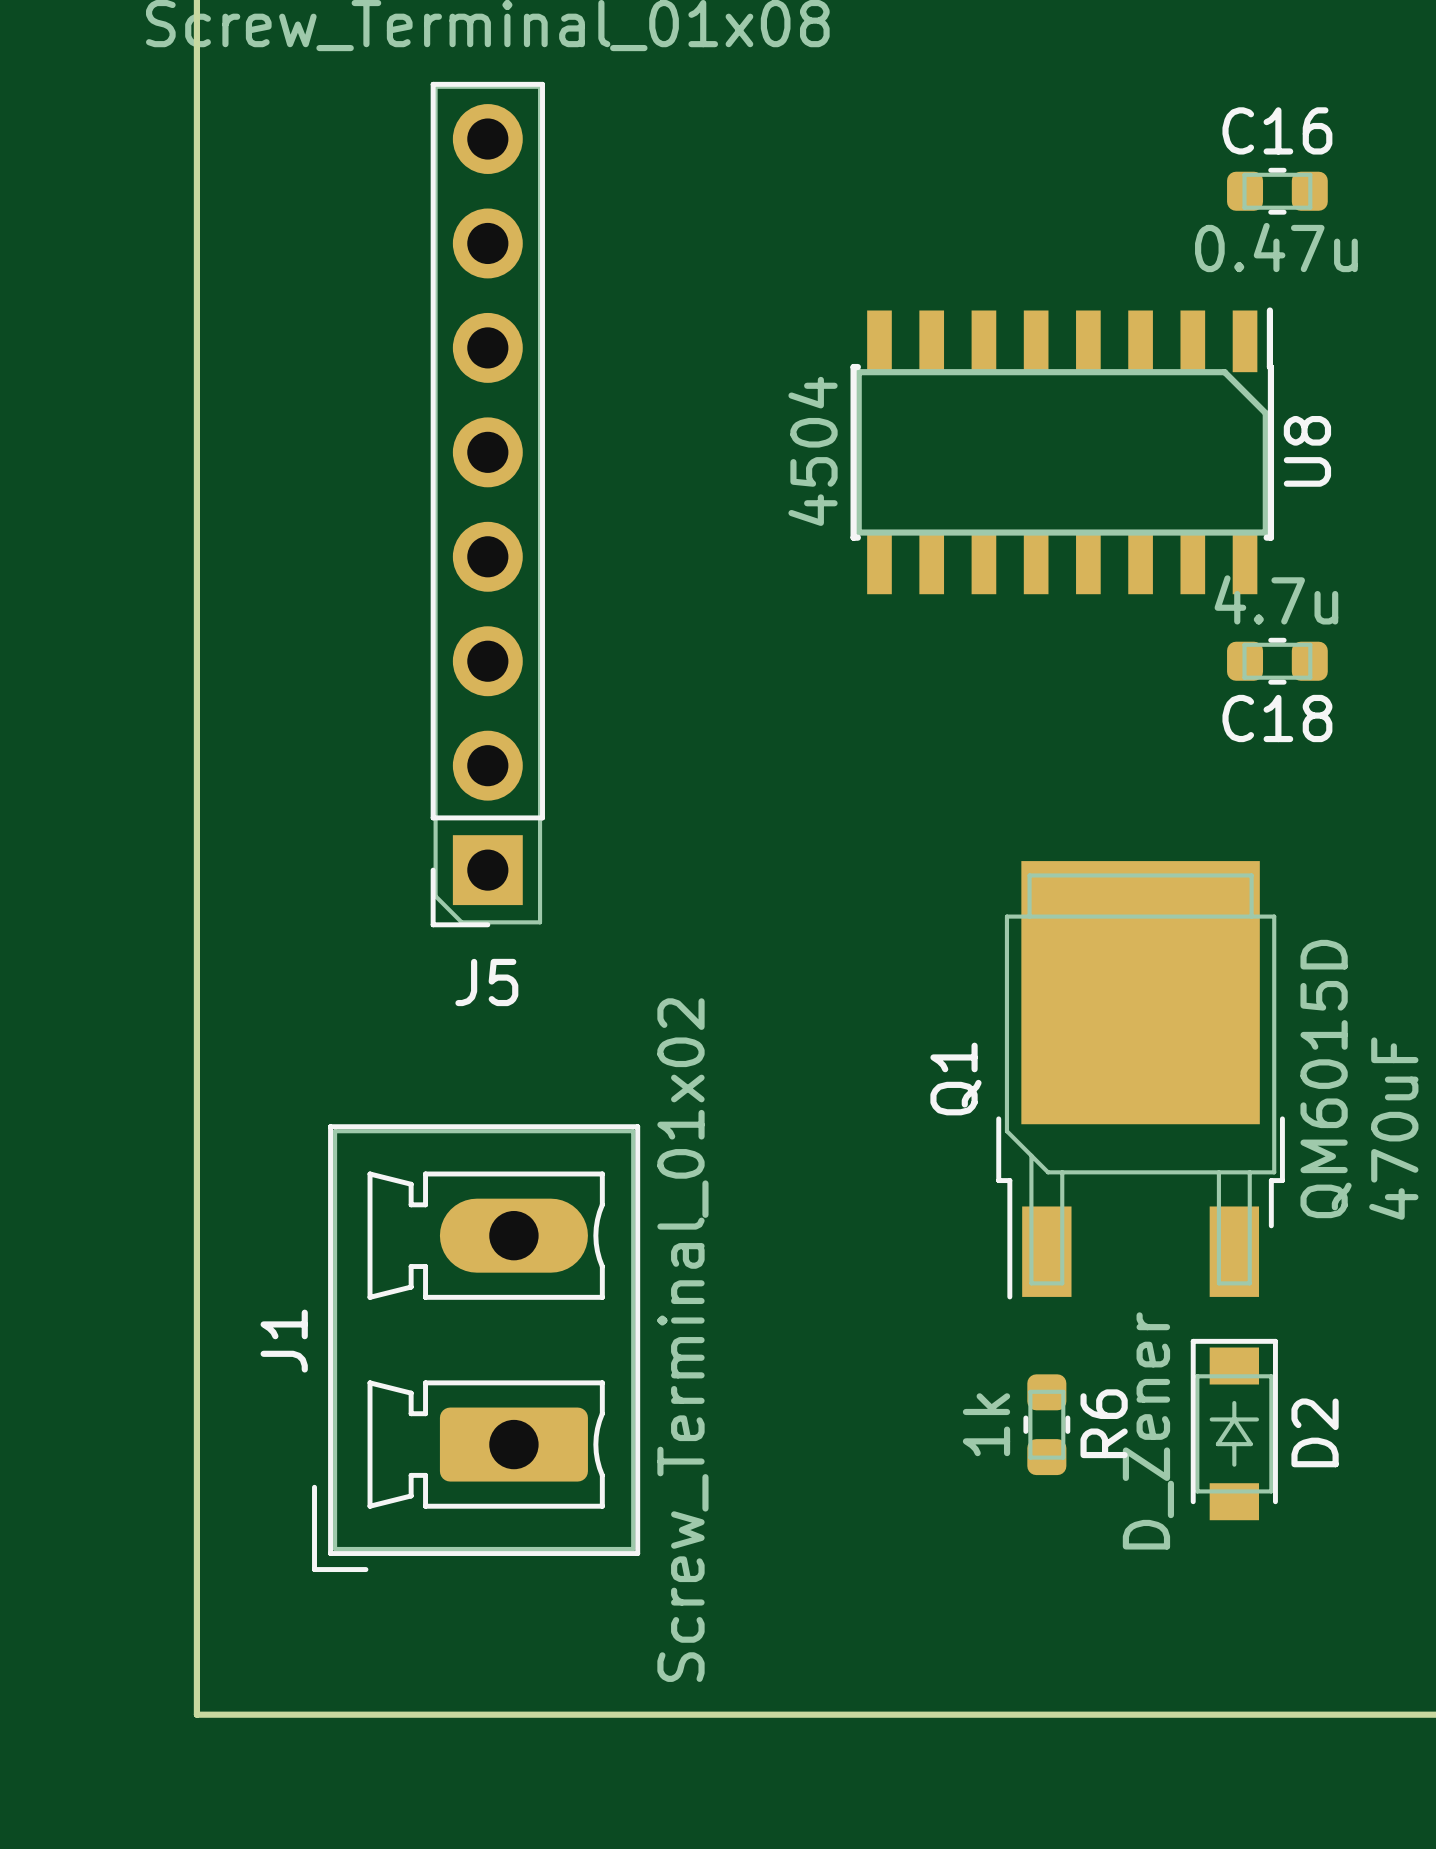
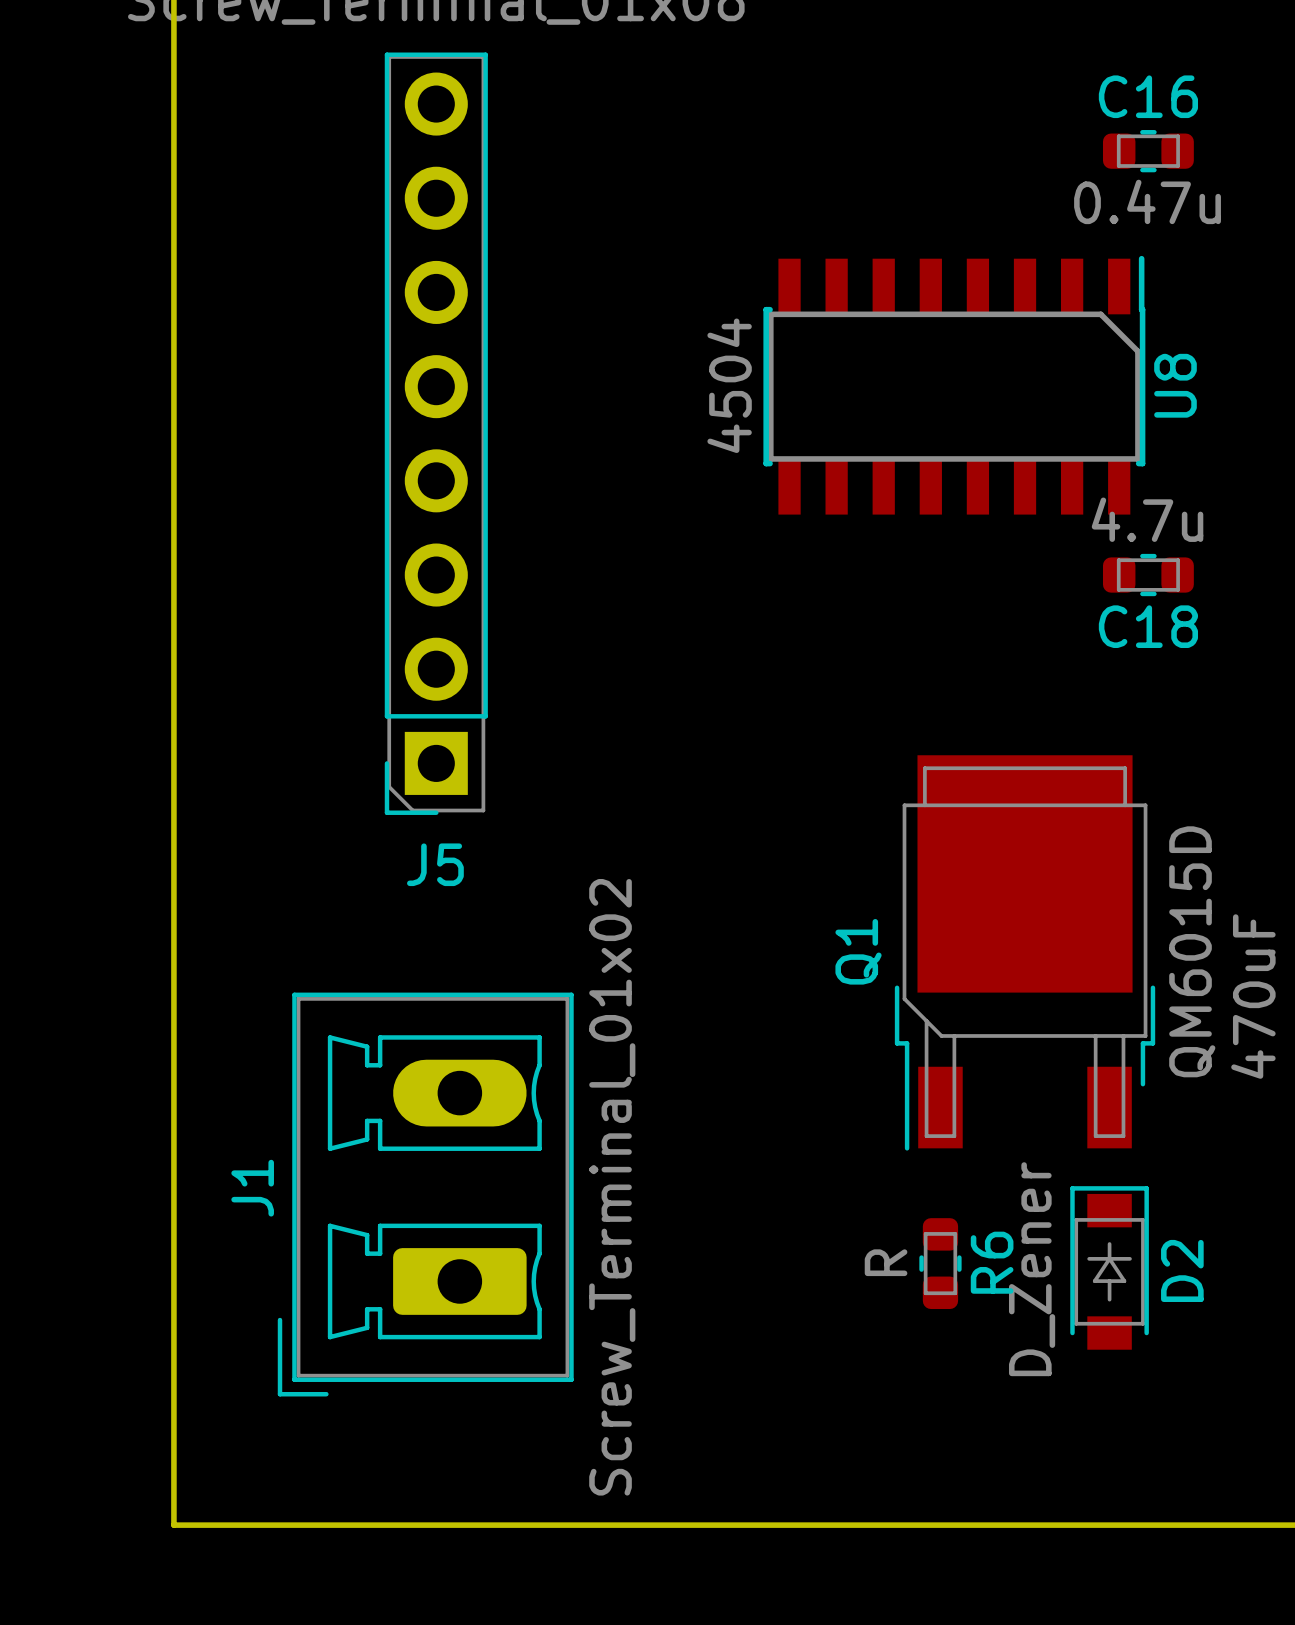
R6 value: 1k (986, 1424) -> R (886, 1262)

